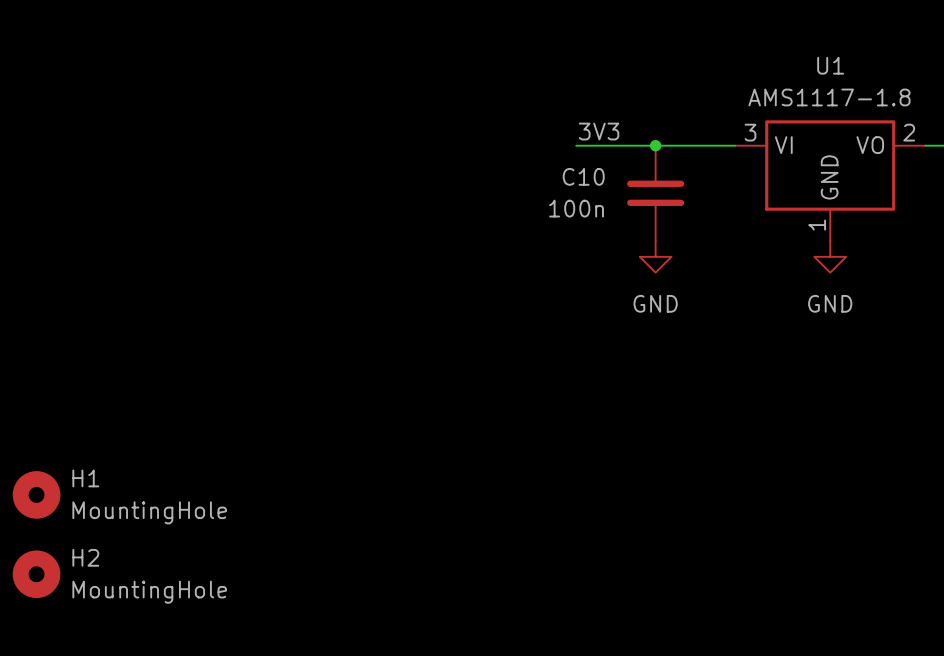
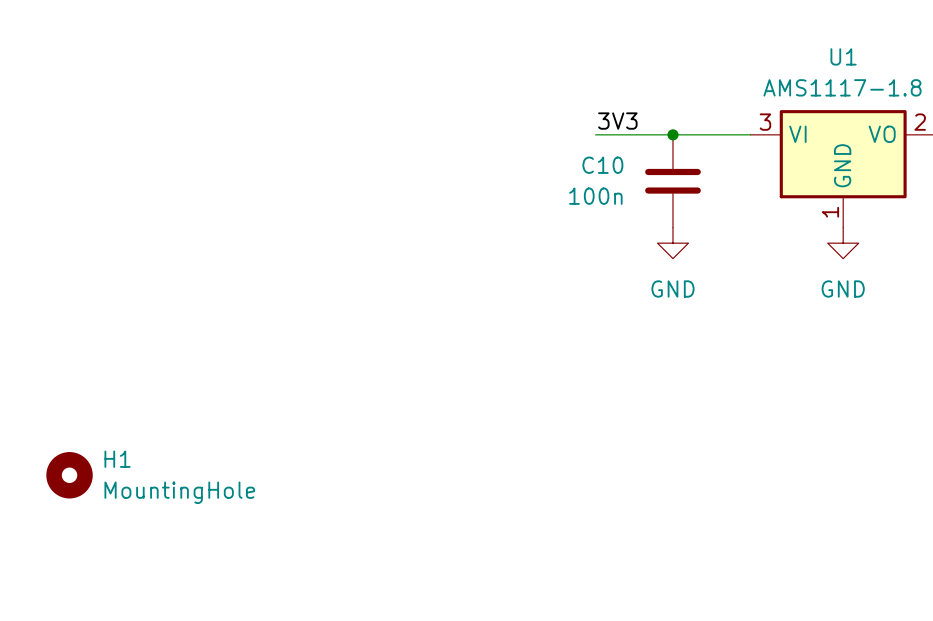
H2: MountingHole (36, 574) -> none

